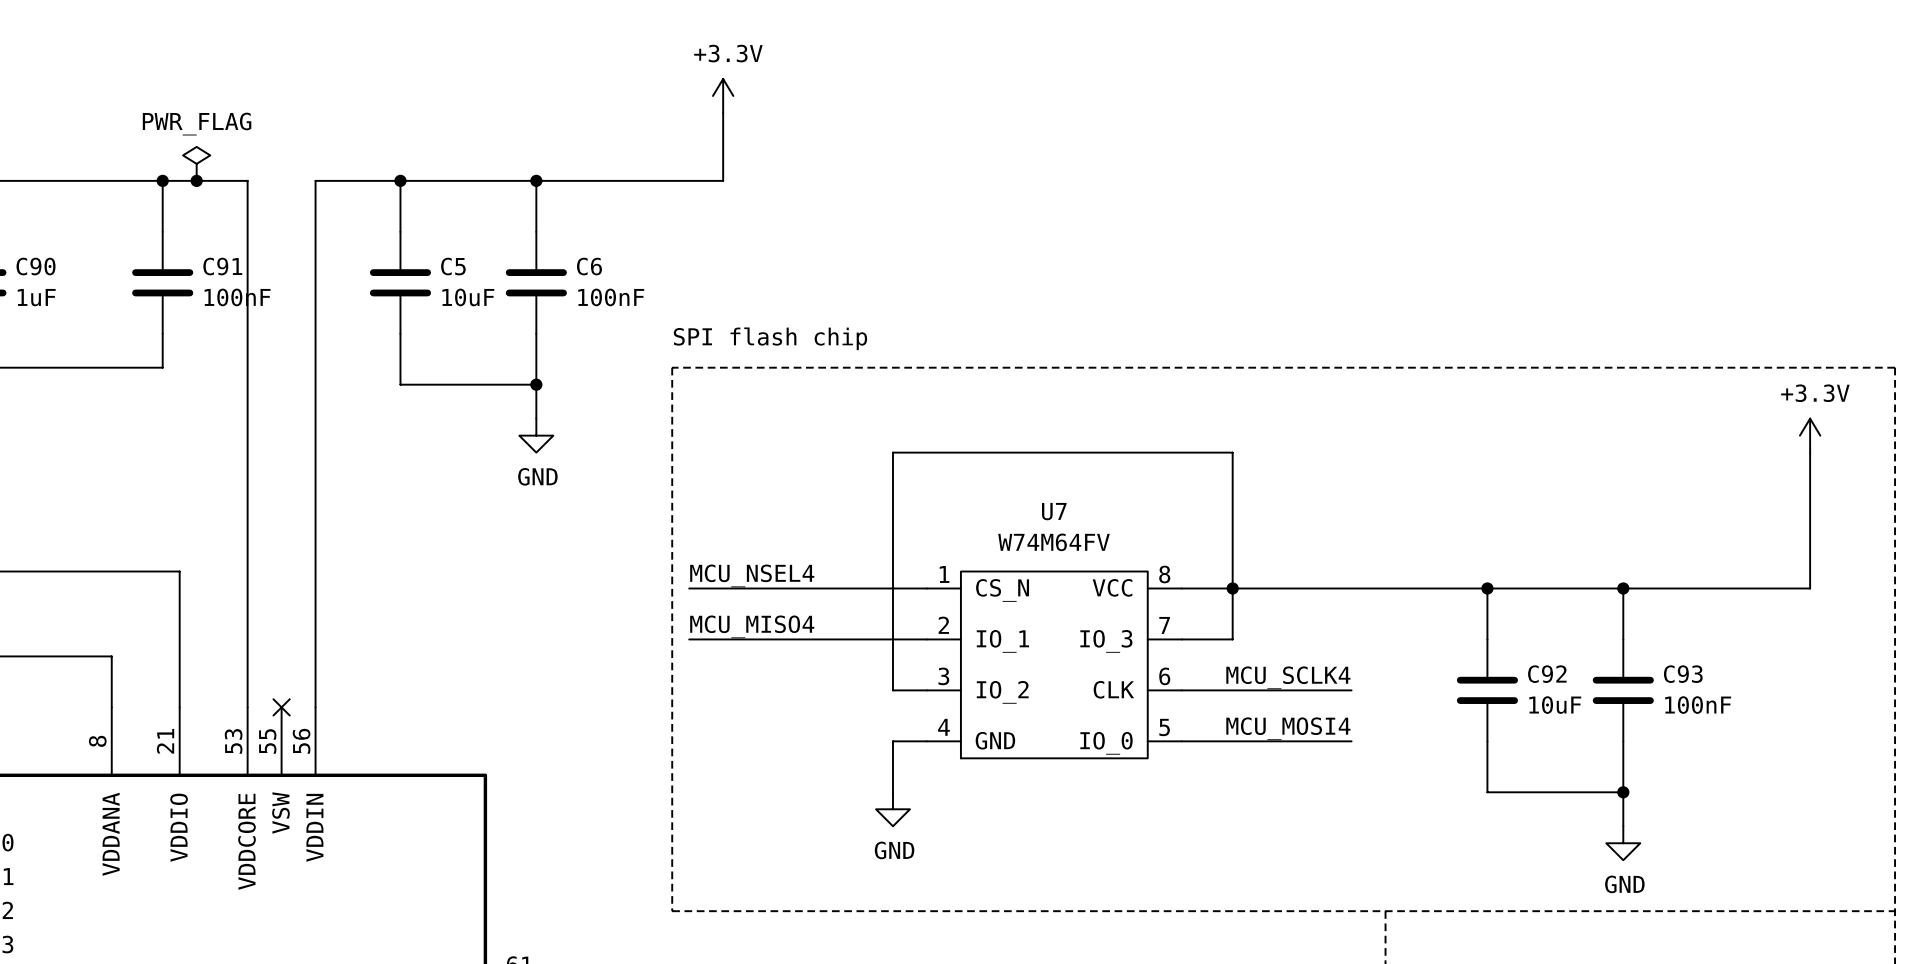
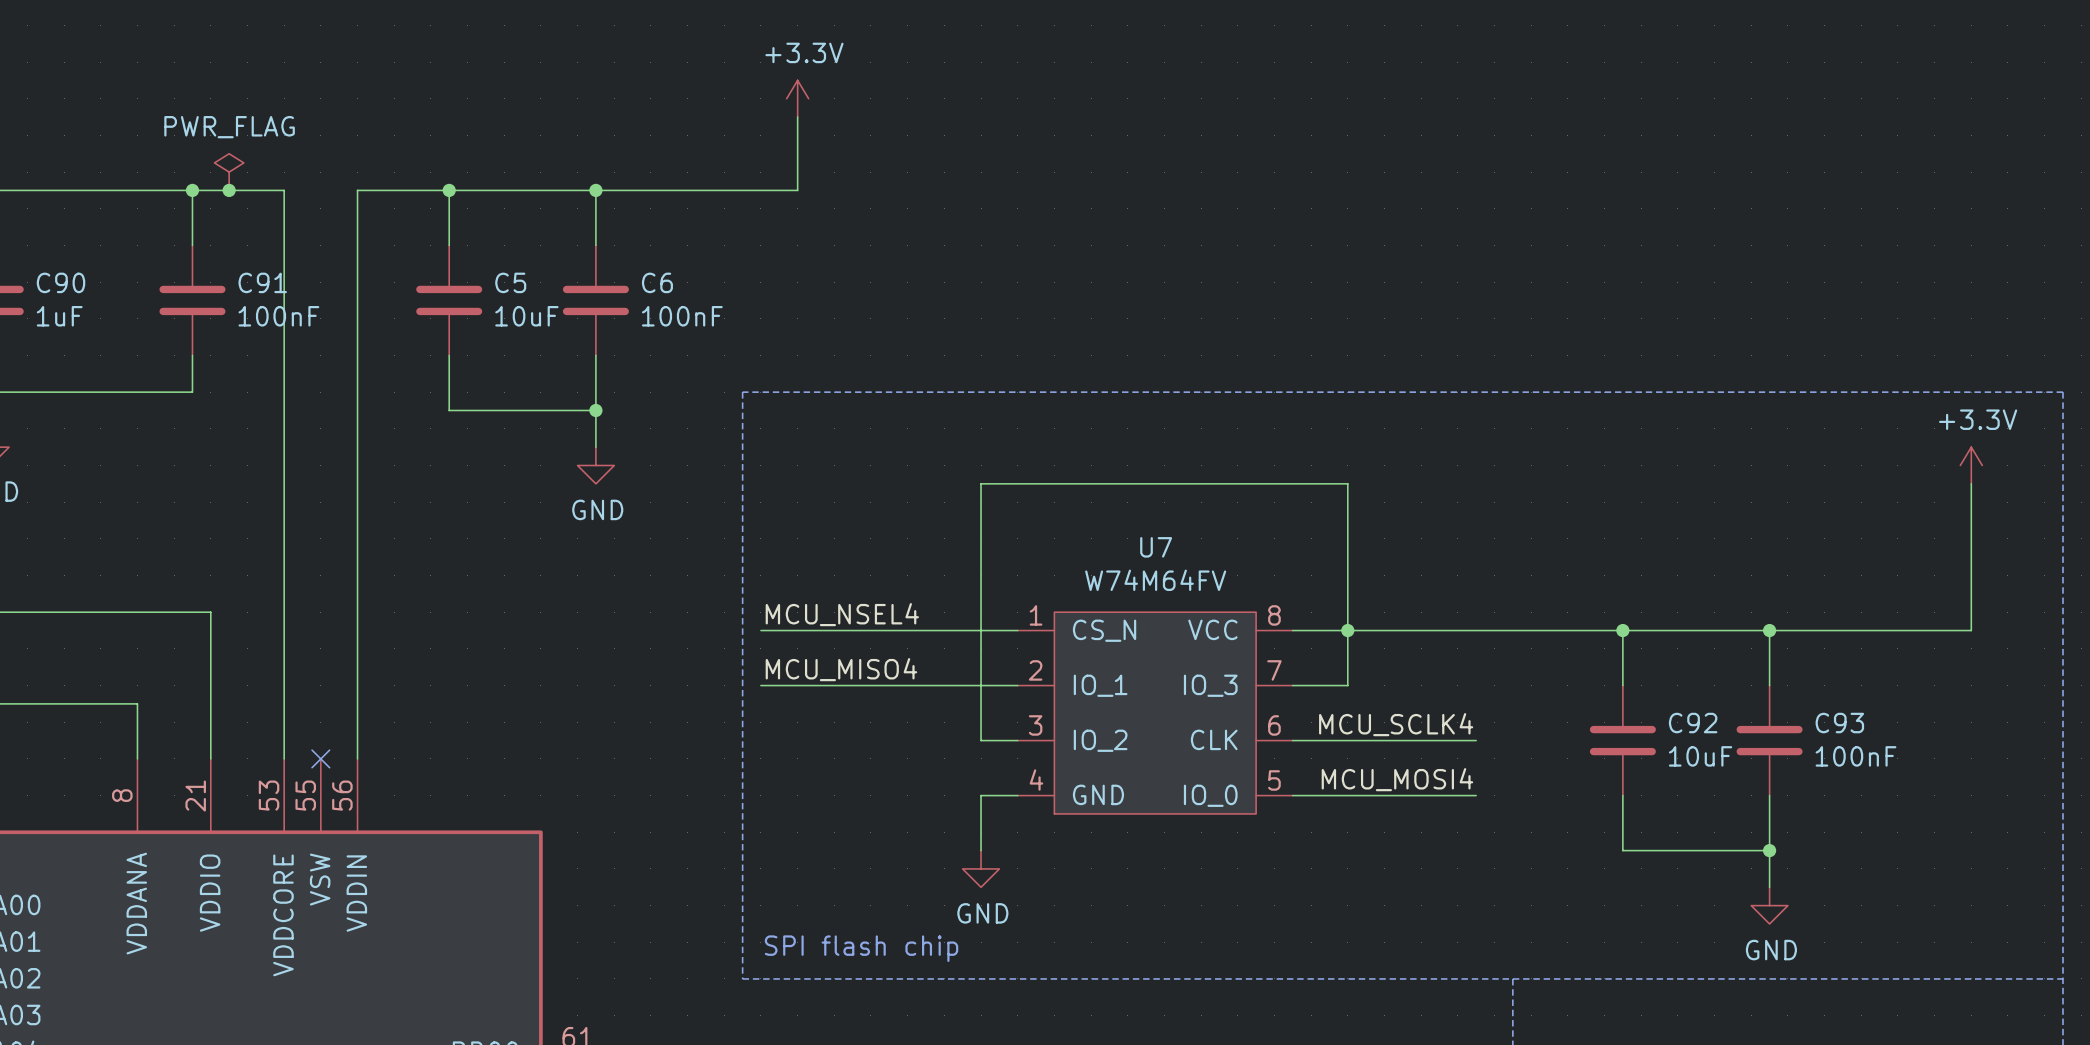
text: SPI flash chip (770, 338) -> none
text: none -> SPI flash chip (861, 948)

